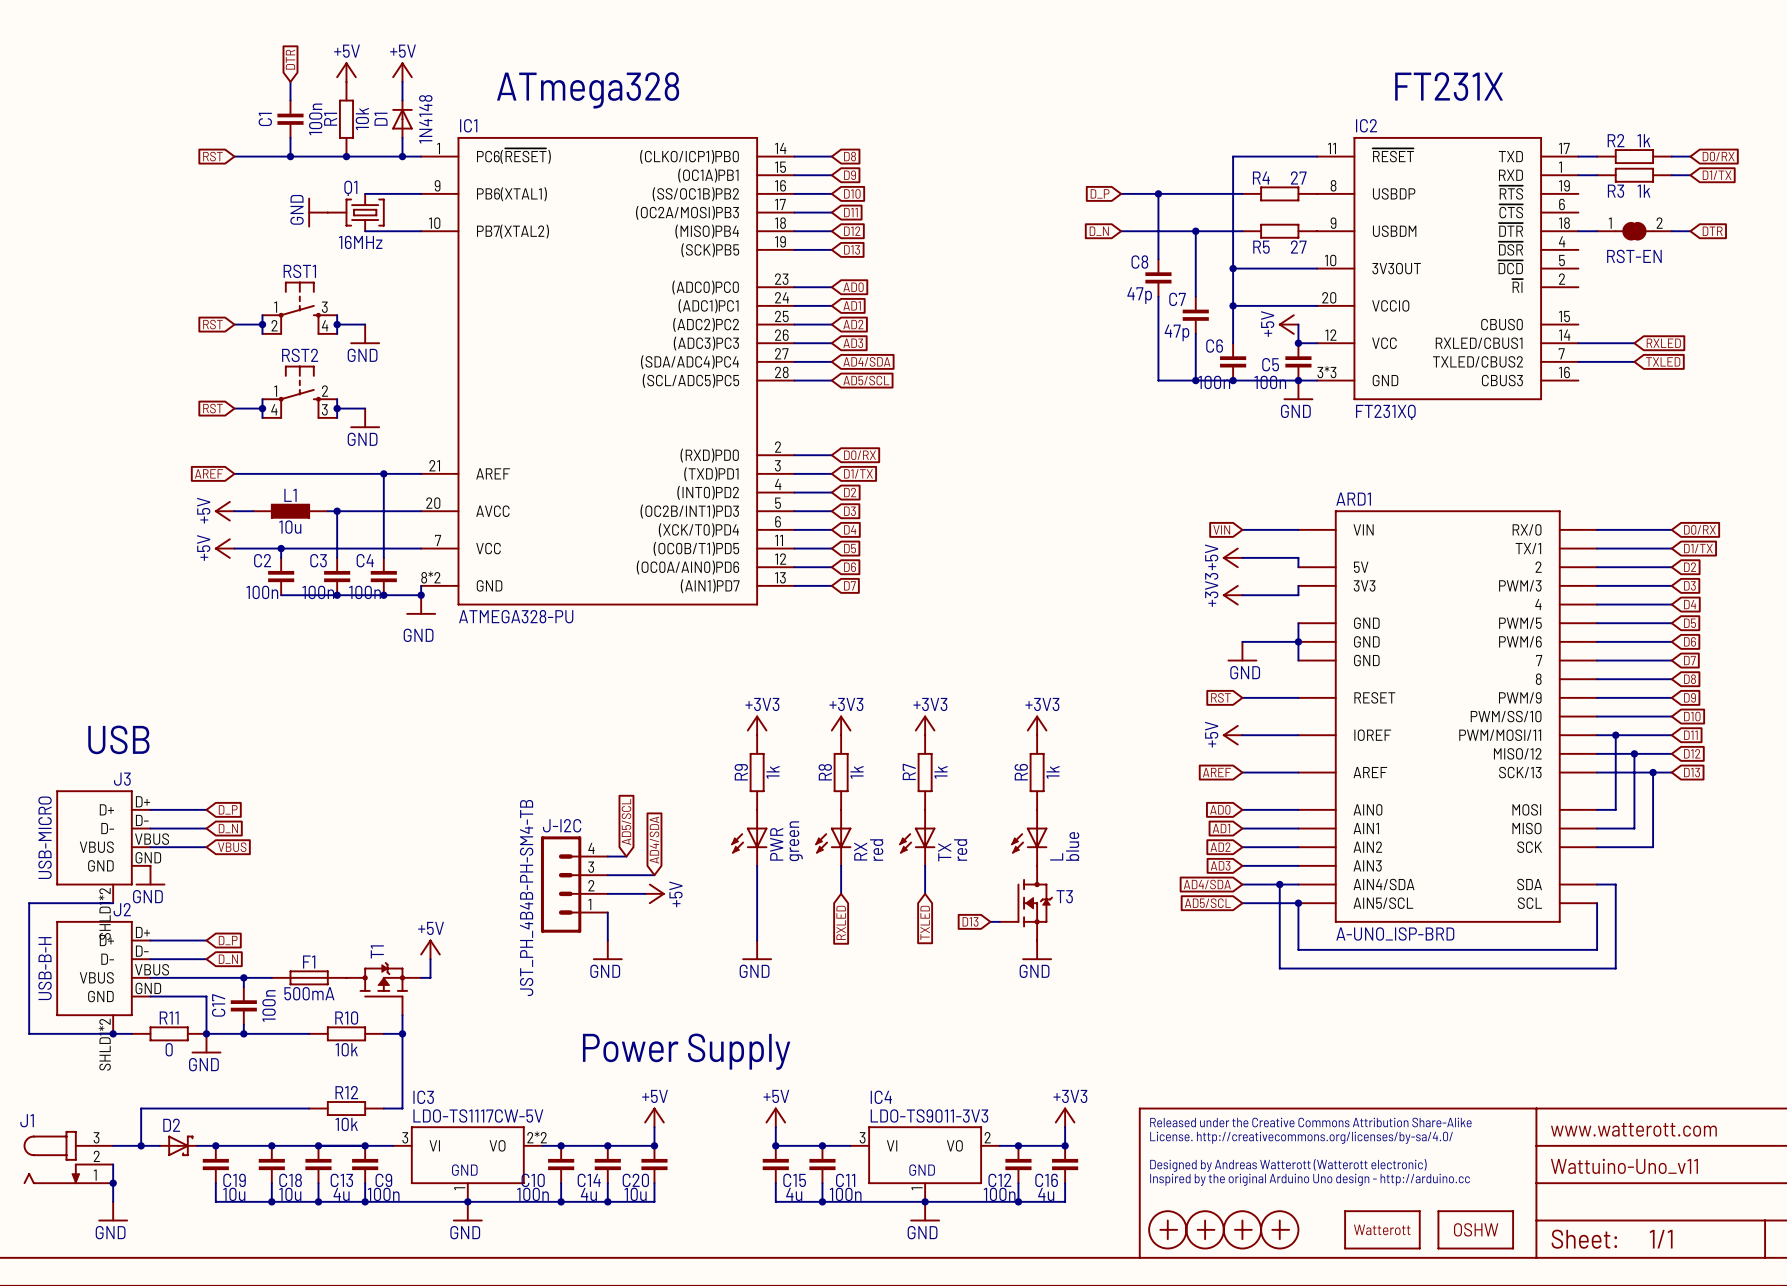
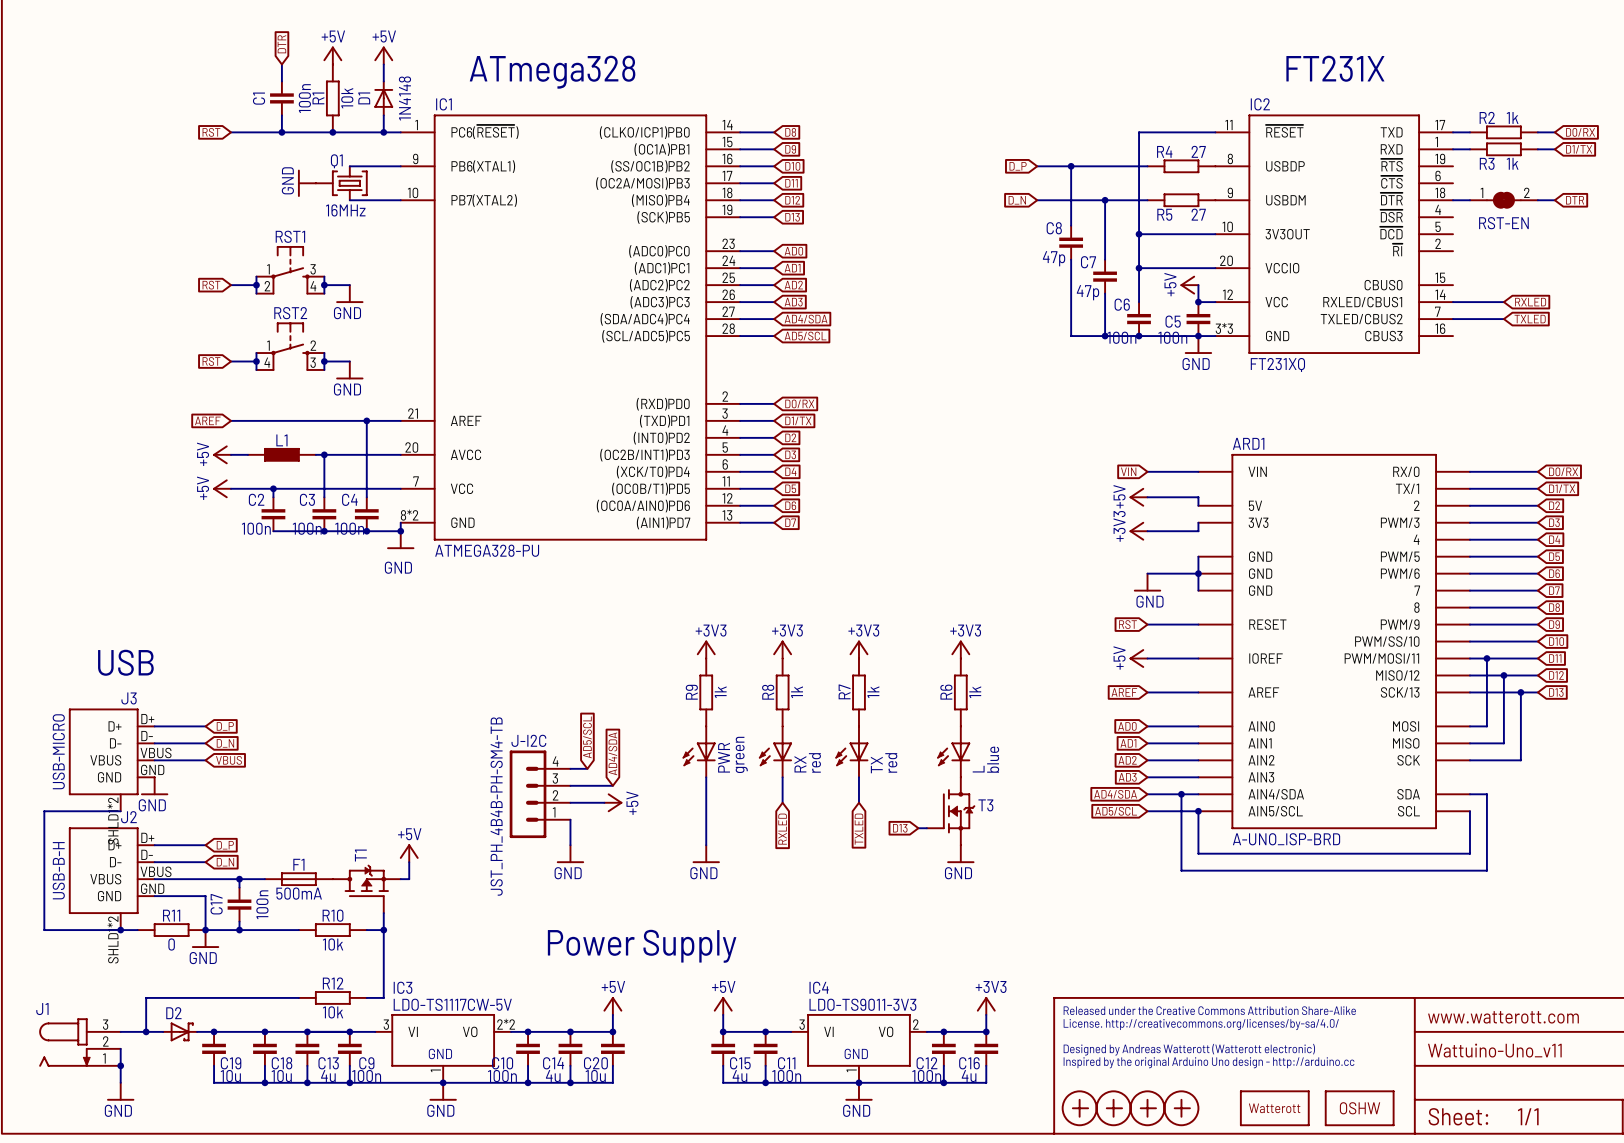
L1 value: 10u (290, 527) -> none

